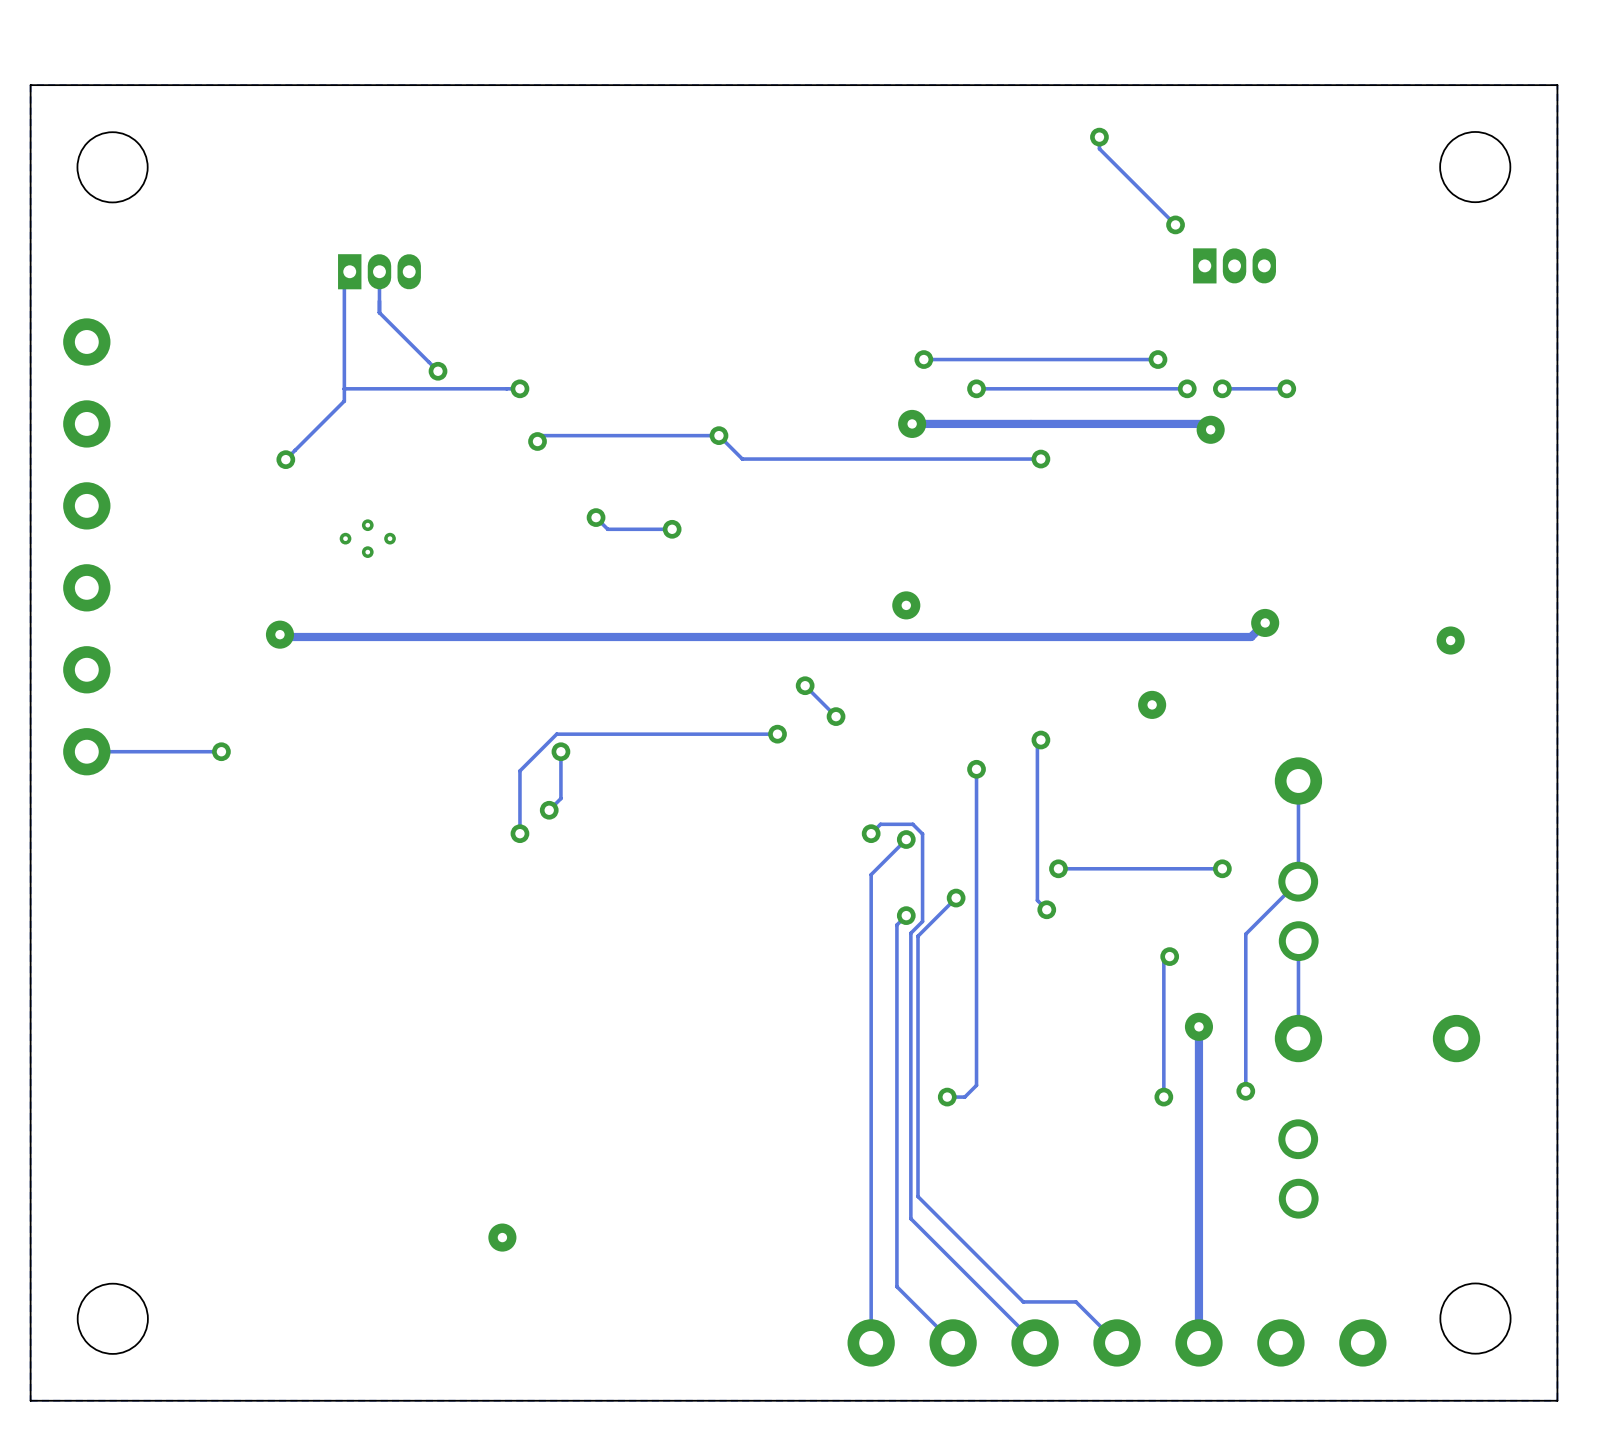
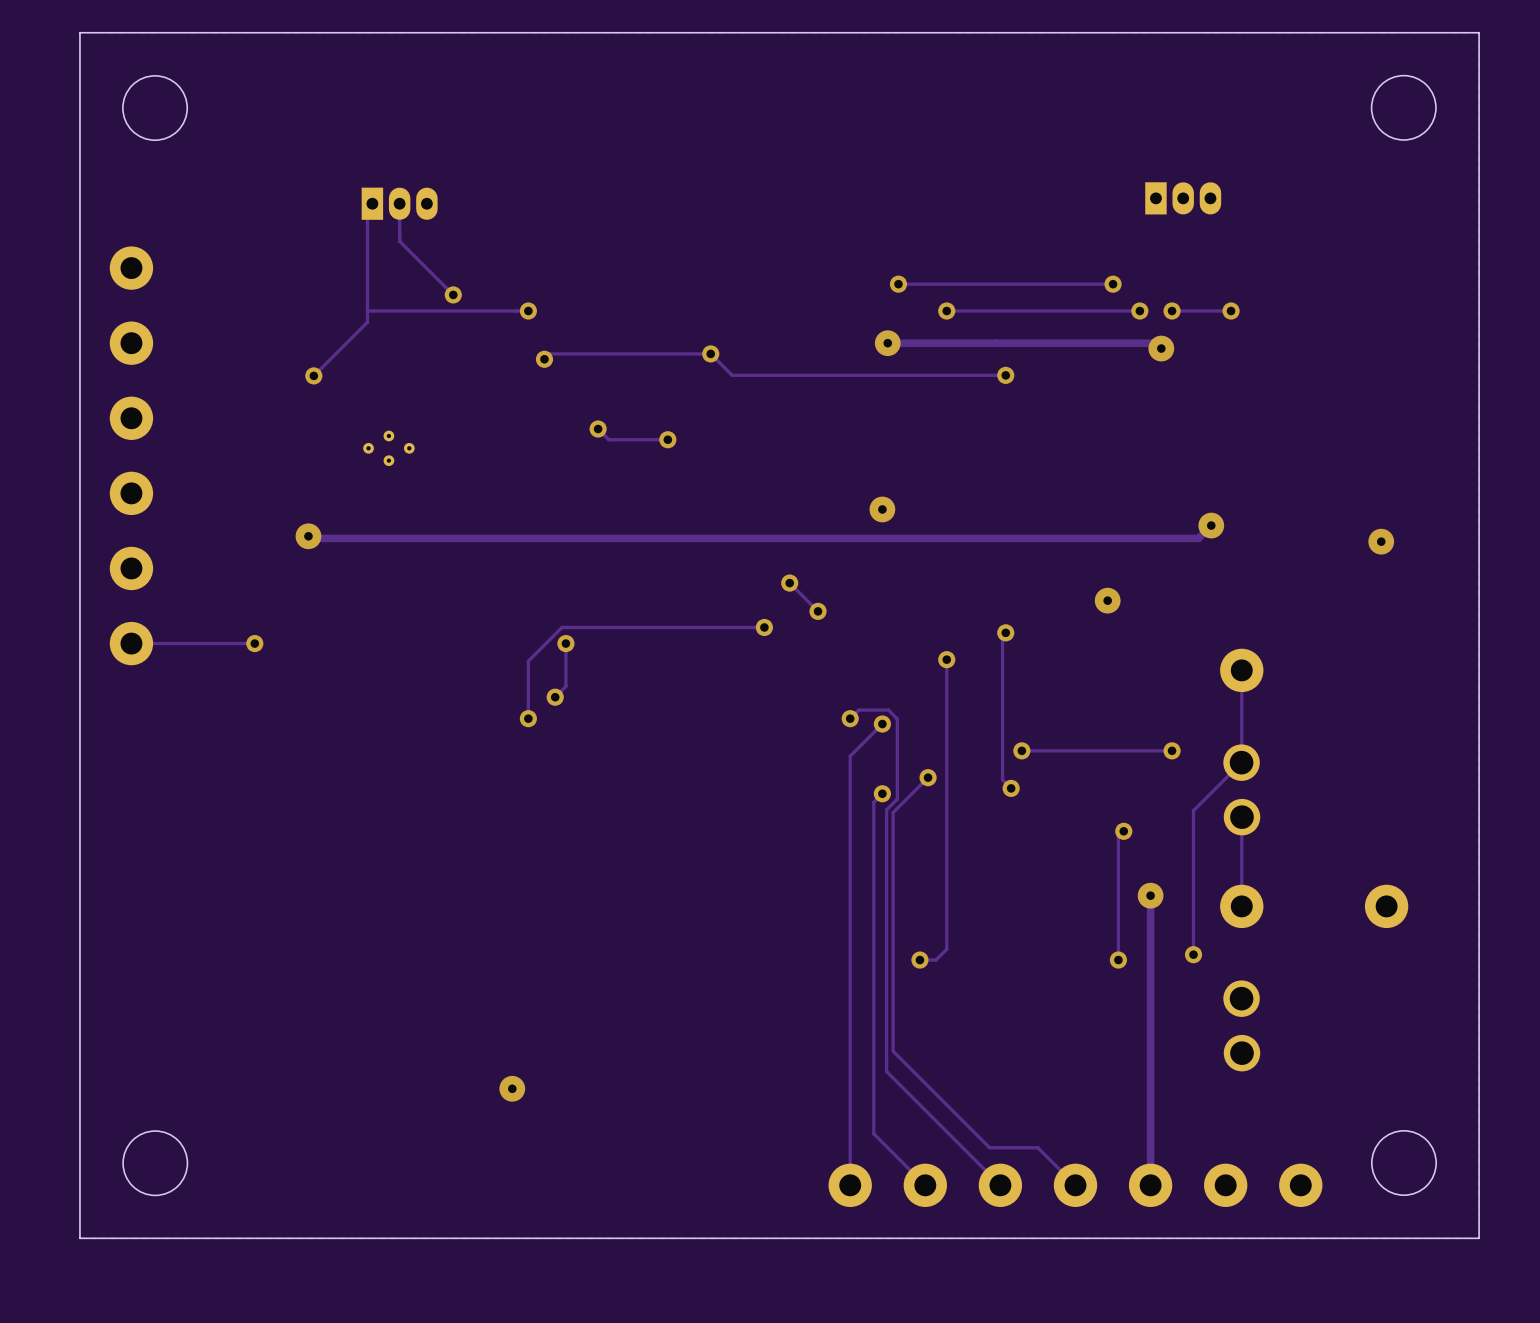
track: (1099, 137) (1099, 148) (1175, 224) -> none
via: (1099, 137) -> none
via: (1175, 224) -> none

